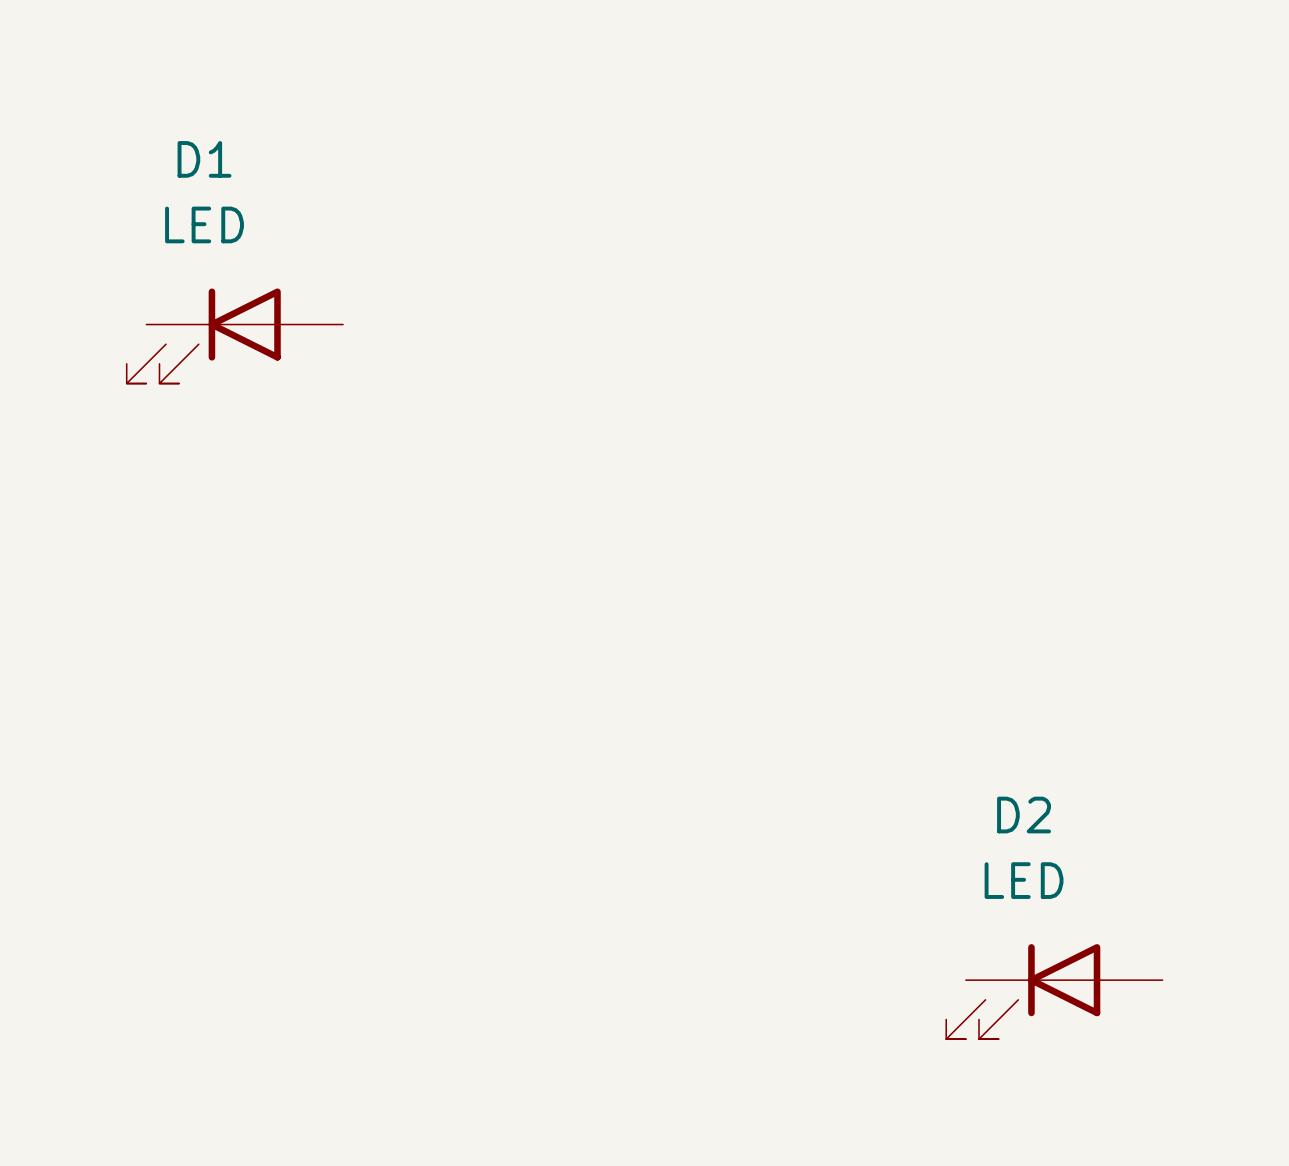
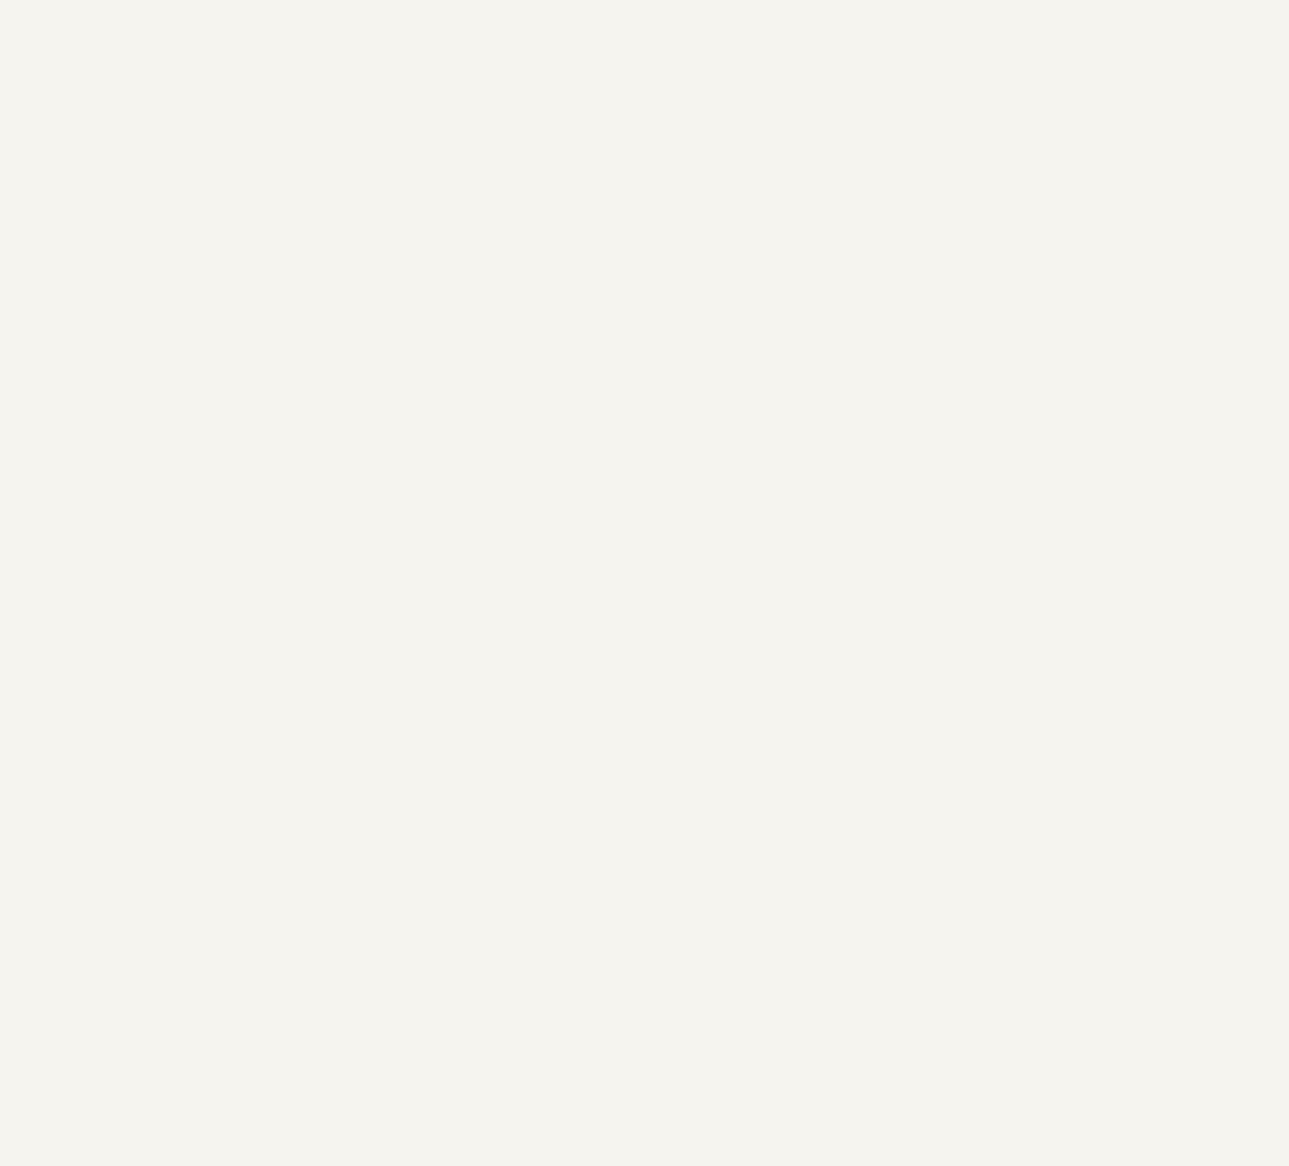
D1: LED (234, 336) -> none
D2: LED (1054, 991) -> none

